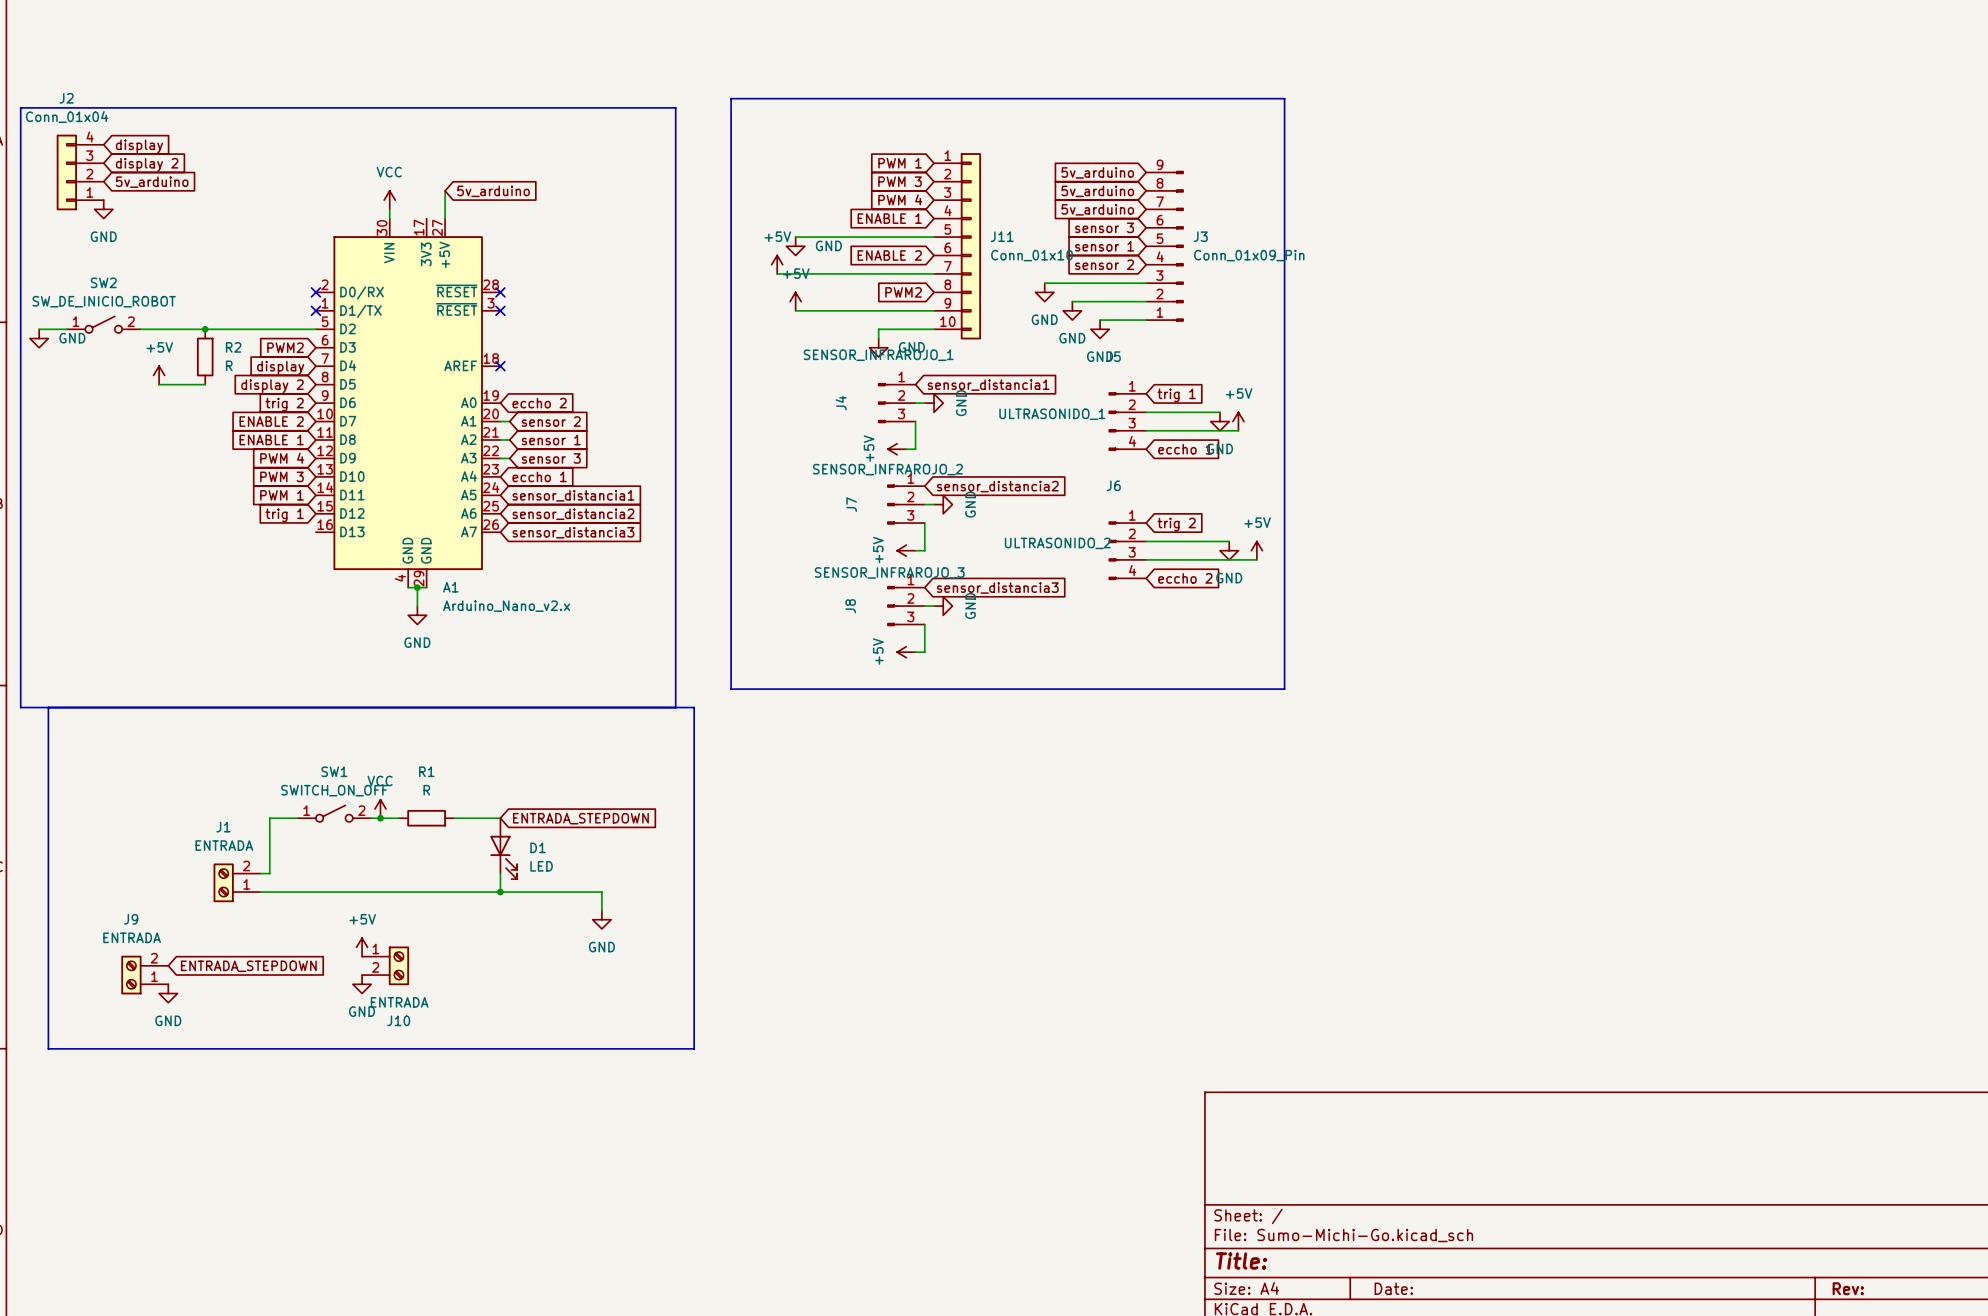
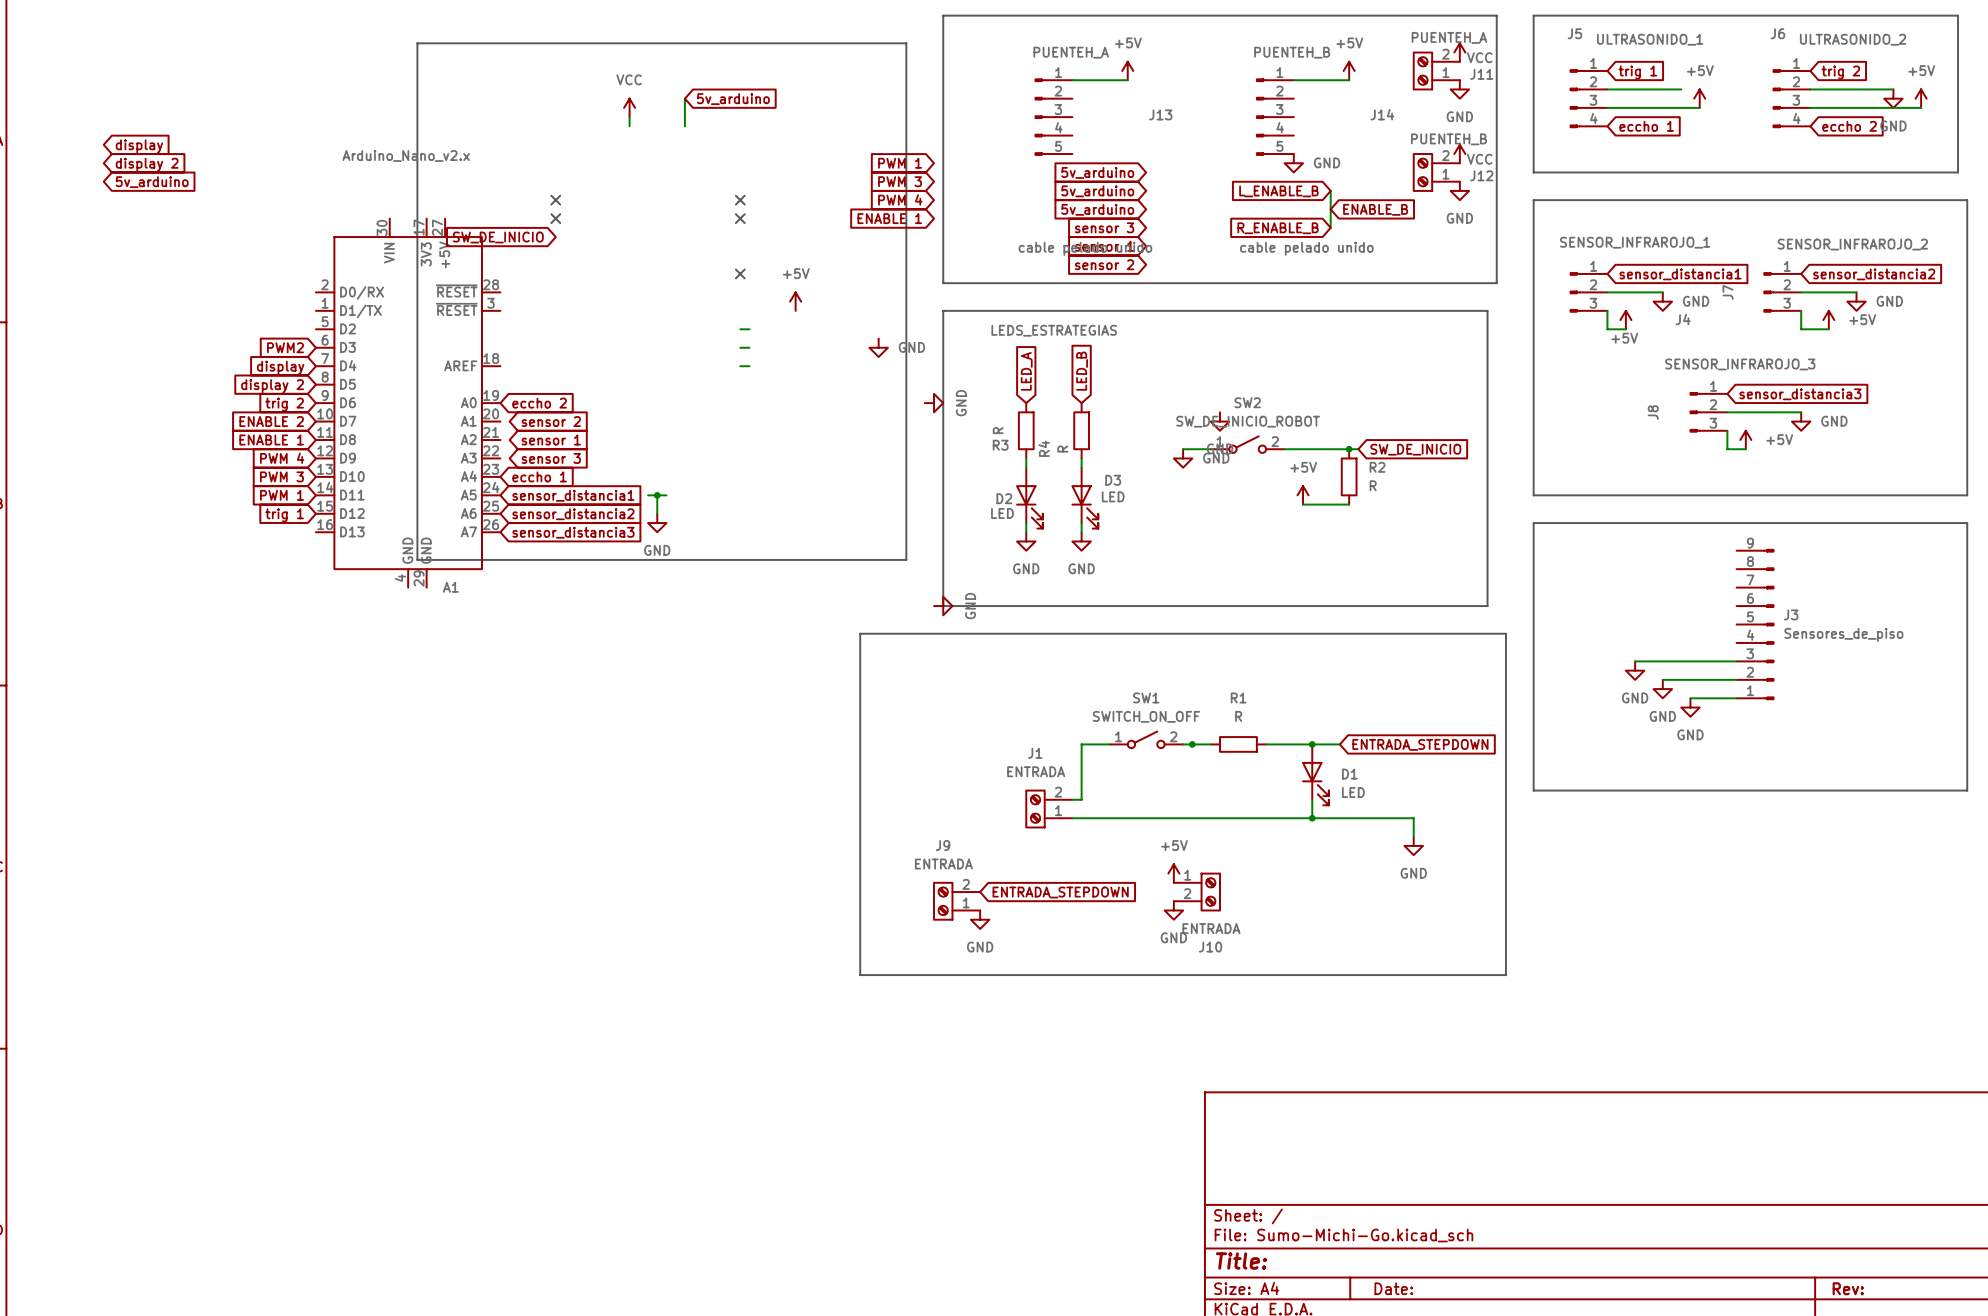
line: none -> (943, 15) (1496, 15) (1496, 283) (943, 283) (943, 15)
line: none -> (1533, 15) (1958, 15) (1958, 172) (1533, 172) (1533, 15)
line: none -> (417, 43) (906, 43) (906, 559) (417, 559) (417, 43)
power symbol: none -> VCC (1459, 52)
power symbol: none -> +5V (1127, 71)
power symbol: none -> +5V (1349, 71)
global label: none -> trig 1 (1637, 72)
global label: none -> trig 2 (1840, 72)
wire: none -> (1072, 80) (1127, 80)
wire: none -> (1293, 80) (1349, 80)
power symbol: none -> GND (1459, 89)
wire: none -> (1607, 89) (1681, 89)
wire: none -> (1810, 89) (1893, 89)
wire: none -> (684, 98) (684, 126)
line: (731, 98) (1284, 98) (1284, 689) (731, 689) (731, 98) -> none
power symbol: none -> +5V (1699, 98)
power symbol: none -> GND (1893, 98)
power symbol: none -> +5V (1921, 98)
global label: none -> 5v_arduino (733, 99)
power symbol: none -> VCC (629, 107)
wire: none -> (1607, 107) (1699, 107)
wire: none -> (1810, 107) (1921, 107)
wire: none -> (629, 117) (629, 126)
J13: none -> PUENTEH_A (1053, 117)
J14: none -> PUENTEH_B (1275, 117)
global label: none -> eccho 1 (1646, 126)
global label: none -> eccho 2 (1849, 126)
J11 symbol: [934, 153, 982, 340] -> [1412, 51, 1460, 91]
power symbol: none -> VCC (1459, 154)
power symbol: none -> GND (1293, 163)
J2: Conn_01x04 (80, 172) -> none
J12: none -> PUENTEH_B (1436, 172)
wire: (445, 190) (445, 218) -> none
wire: none -> (1330, 190) (1330, 227)
power symbol: none -> GND (1459, 190)
global label: 5v_arduino (493, 191) -> none
global label: none -> L_ENABLE_B (1278, 191)
power symbol: VCC (389, 200) -> none
no-connect mark: none -> (555, 200)
no-connect mark: none -> (740, 200)
line: none -> (1533, 200) (1533, 495) (1967, 495) (1967, 200) (1533, 200)
power symbol: GND (103, 209) -> none
wire: (389, 209) (389, 218) -> none
global label: none -> ENABLE_B (1375, 209)
no-connect mark: none -> (555, 218)
no-connect mark: none -> (740, 218)
global label: none -> R_ENABLE_B (1278, 228)
global label: none -> SW_DE_INICIO (498, 237)
wire: (795, 237) (934, 237) -> none
power symbol: GND (795, 246) -> none
J3 position: (1164, 246) -> (1755, 624)
label: none -> cable pelado unido (1085, 248)
label: none -> cable pelado unido (1306, 248)
global label: ENABLE 2 (889, 255) -> none
J11 value: Conn_01x10 (1032, 255) -> PUENTEH_A (1449, 37)
J3 value: Conn_01x09_Pin (1249, 255) -> Sensores_de_piso (1843, 634)
power symbol: +5V (777, 264) -> none
no-connect mark: none -> (740, 273)
wire: (777, 273) (934, 273) -> none
global label: none -> sensor_distancia1 (1680, 274)
global label: none -> sensor_distancia2 (1874, 274)
no-connect mark: (315, 292) -> none
no-connect mark: (500, 292) -> none
global label: PWM2 (903, 292) -> none
power symbol: GND (1044, 292) -> none
wire: none -> (1607, 292) (1662, 292)
wire: none -> (1801, 292) (1856, 292)
wire: (1072, 301) (1146, 301) -> none
power symbol: none -> GND (1662, 301)
power symbol: none -> GND (1856, 301)
no-connect mark: (315, 310) -> none
no-connect mark: (500, 310) -> none
wire: (795, 310) (934, 310) -> none
line: none -> (943, 310) (943, 606) (1487, 606) (1487, 310) (943, 310)
power symbol: GND (1072, 310) -> none
wire: none -> (1607, 310) (1607, 329) (1625, 329)
wire: none -> (1801, 310) (1801, 329) (1828, 329)
wire: (1100, 320) (1146, 320) -> none
power symbol: none -> +5V (1625, 320)
power symbol: none -> +5V (1828, 320)
SW2 position: (103, 324) -> (1247, 444)
wire: (39, 329) (66, 329) -> none
wire: (140, 329) (315, 329) -> none
junction: (205, 329) -> none
wire: none -> (740, 329) (749, 329)
wire: (934, 329) (878, 329) (878, 338) -> none
power symbol: GND (1100, 329) -> none
label: none -> LEDS_ESTRATEGIAS (1054, 330)
power symbol: GND (39, 338) -> none
wire: none -> (740, 347) (749, 347)
J4 value position: SENSOR_INFRAROJO_1 (878, 355) -> SENSOR_INFRAROJO_1 (1635, 242)
R2 position: (205, 356) -> (1349, 476)
no-connect mark: (500, 366) -> none
global label: none -> LED_A (1026, 371)
global label: none -> LED_B (1082, 371)
power symbol: +5V (159, 375) -> none
wire: (159, 384) (205, 384) -> none
global label: sensor_distancia1 (988, 385) -> none
global label: none -> sensor_distancia3 (1800, 394)
global label: trig 1 (1176, 395) -> none
J4 name rotation: 0° (841, 403) -> 90° clockwise (1683, 319)
J4 name position: J4 (841, 403) -> J4 (1683, 319)
J4 position: (896, 403) -> (1588, 292)
wire: (915, 403) (924, 403) -> (740, 366) (749, 366)
wire: (1146, 412) (1219, 412) -> (1284, 449) (1358, 449)
wire: none -> (1727, 412) (1801, 412)
J5 value position: ULTRASONIDO_1 (1052, 414) -> ULTRASONIDO_1 (1650, 39)
wire: (500, 421) (509, 421) -> none
wire: (915, 421) (915, 449) (906, 449) -> none
J5 position: (1127, 421) -> (1588, 98)
power symbol: +5V (1238, 421) -> none
power symbol: none -> GND (1801, 421)
R3: none -> R (1026, 430)
R4: none -> R (1081, 430)
wire: (1146, 430) (1238, 430) -> none
wire: none -> (1727, 430) (1727, 449) (1745, 449)
wire: (500, 440) (509, 440) -> none
power symbol: none -> +5V (1745, 440)
power symbol: +5V (897, 449) -> none
wire: none -> (1183, 449) (1210, 449)
global label: eccho 1 (1185, 449) -> none
junction: none -> (1349, 449)
global label: none -> SW_DE_INICIO (1415, 449)
wire: (500, 458) (509, 458) -> none
wire: none -> (1026, 458) (1026, 467)
wire: none -> (1081, 458) (1081, 467)
power symbol: none -> GND (1183, 458)
J7 value position: SENSOR_INFRAROJO_2 (887, 469) -> SENSOR_INFRAROJO_2 (1852, 244)
global label: sensor_distancia2 (997, 486) -> none
wire: none -> (648, 495) (666, 495)
wire: none -> (657, 495) (657, 513)
junction: none -> (657, 495)
power symbol: none -> +5V (1303, 495)
D2: none -> LED (1029, 498)
D3: none -> LED (1084, 498)
J7 position: (906, 504) -> (1782, 292)
wire: (924, 504) (934, 504) -> none
power symbol: GND (943, 504) -> none
wire: none -> (1303, 504) (1349, 504)
power symbol: none -> GND (657, 523)
wire: (924, 523) (924, 550) (915, 550) -> none
wire: none -> (1026, 523) (1026, 532)
wire: none -> (1081, 523) (1081, 532)
line: none -> (1533, 523) (1967, 523) (1967, 790) (1533, 790) (1533, 523)
global label: trig 2 (1176, 524) -> none
power symbol: none -> GND (1026, 541)
power symbol: none -> GND (1081, 541)
wire: (1146, 541) (1229, 541) -> none
J6 value position: ULTRASONIDO_2 (1057, 543) -> ULTRASONIDO_2 (1853, 39)
power symbol: +5V (906, 550) -> none
J6 position: (1127, 550) -> (1791, 98)
power symbol: GND (1229, 550) -> none
power symbol: +5V (1256, 550) -> none
wire: (1146, 559) (1256, 559) -> none
J8 value position: SENSOR_INFRAROJO_3 (889, 572) -> SENSOR_INFRAROJO_3 (1740, 364)
global label: eccho 2 (1185, 578) -> none
wire: (408, 587) (426, 587) -> none
wire: (417, 587) (417, 606) -> none
junction: (417, 587) -> none
global label: sensor_distancia3 (997, 588) -> none
A1 value position: Arduino_Nano_v2.x (506, 606) -> Arduino_Nano_v2.x (406, 155)
J8 position: (906, 606) -> (1708, 412)
wire: (924, 606) (934, 606) -> none
power symbol: GND (417, 615) -> none
wire: (924, 624) (924, 652) (915, 652) -> none
line: none -> (860, 633) (1505, 633) (1505, 975) (860, 975) (860, 633)
power symbol: +5V (906, 652) -> none
wire: none -> (1635, 661) (1736, 661)
power symbol: none -> GND (1635, 670)
wire: none -> (1662, 679) (1736, 679)
power symbol: none -> GND (1662, 689)
wire: none -> (1690, 698) (1736, 698)
line: (48, 707) (48, 1048) (694, 1048) (694, 707) (20, 707) (20, 107) (675, 107) (675, 707) -> none
power symbol: none -> GND (1690, 707)
wire: none -> (1109, 744) (1081, 744) (1081, 799) (1072, 799)
wire: none -> (1183, 744) (1210, 744)
junction: none -> (1192, 744)
wire: none -> (1266, 744) (1339, 744)
junction: none -> (1312, 744)
global label: none -> ENTRADA_STEPDOWN (1420, 744)
wire: none -> (1312, 799) (1312, 818)
power symbol: VCC (380, 809) -> none
SW1 position: (334, 813) -> (1146, 739)
wire: (297, 818) (269, 818) (269, 873) (260, 873) -> none
wire: (371, 818) (398, 818) -> none
junction: (380, 818) -> none
R1 position: (426, 818) -> (1238, 744)
wire: (454, 818) (500, 818) -> none
global label: ENTRADA_STEPDOWN (580, 818) -> none
wire: none -> (1072, 818) (1413, 818) (1413, 836)
junction: none -> (1312, 818)
power symbol: none -> GND (1413, 845)
D1 position: (503, 848) -> (1315, 774)
wire: (500, 873) (500, 892) -> none
power symbol: none -> +5V (1173, 873)
J1 position: (237, 882) -> (1048, 809)
wire: (260, 892) (601, 892) (601, 910) -> none
junction: (500, 892) -> none
global label: none -> ENTRADA_STEPDOWN (1060, 892)
power symbol: none -> GND (1173, 910)
power symbol: GND (601, 919) -> none
power symbol: none -> GND (980, 919)
power symbol: +5V (362, 947) -> none
J10 position: (385, 965) -> (1197, 892)
global label: ENTRADA_STEPDOWN (248, 966) -> none
J9 position: (144, 975) -> (956, 901)
power symbol: GND (362, 984) -> none
power symbol: GND (168, 993) -> none

